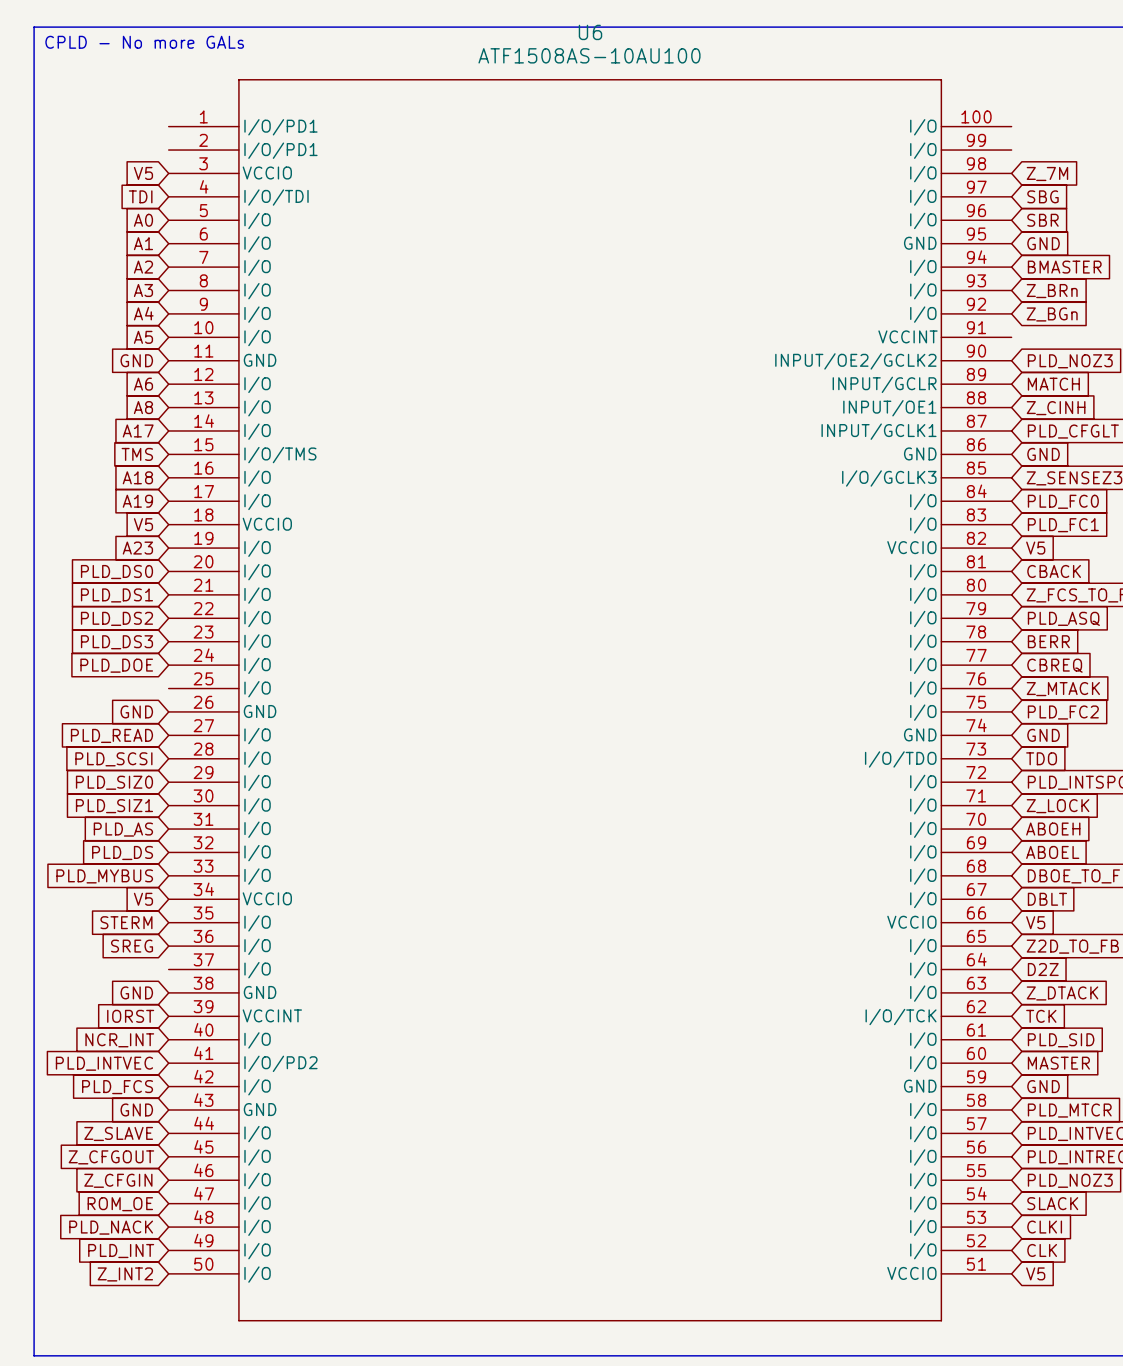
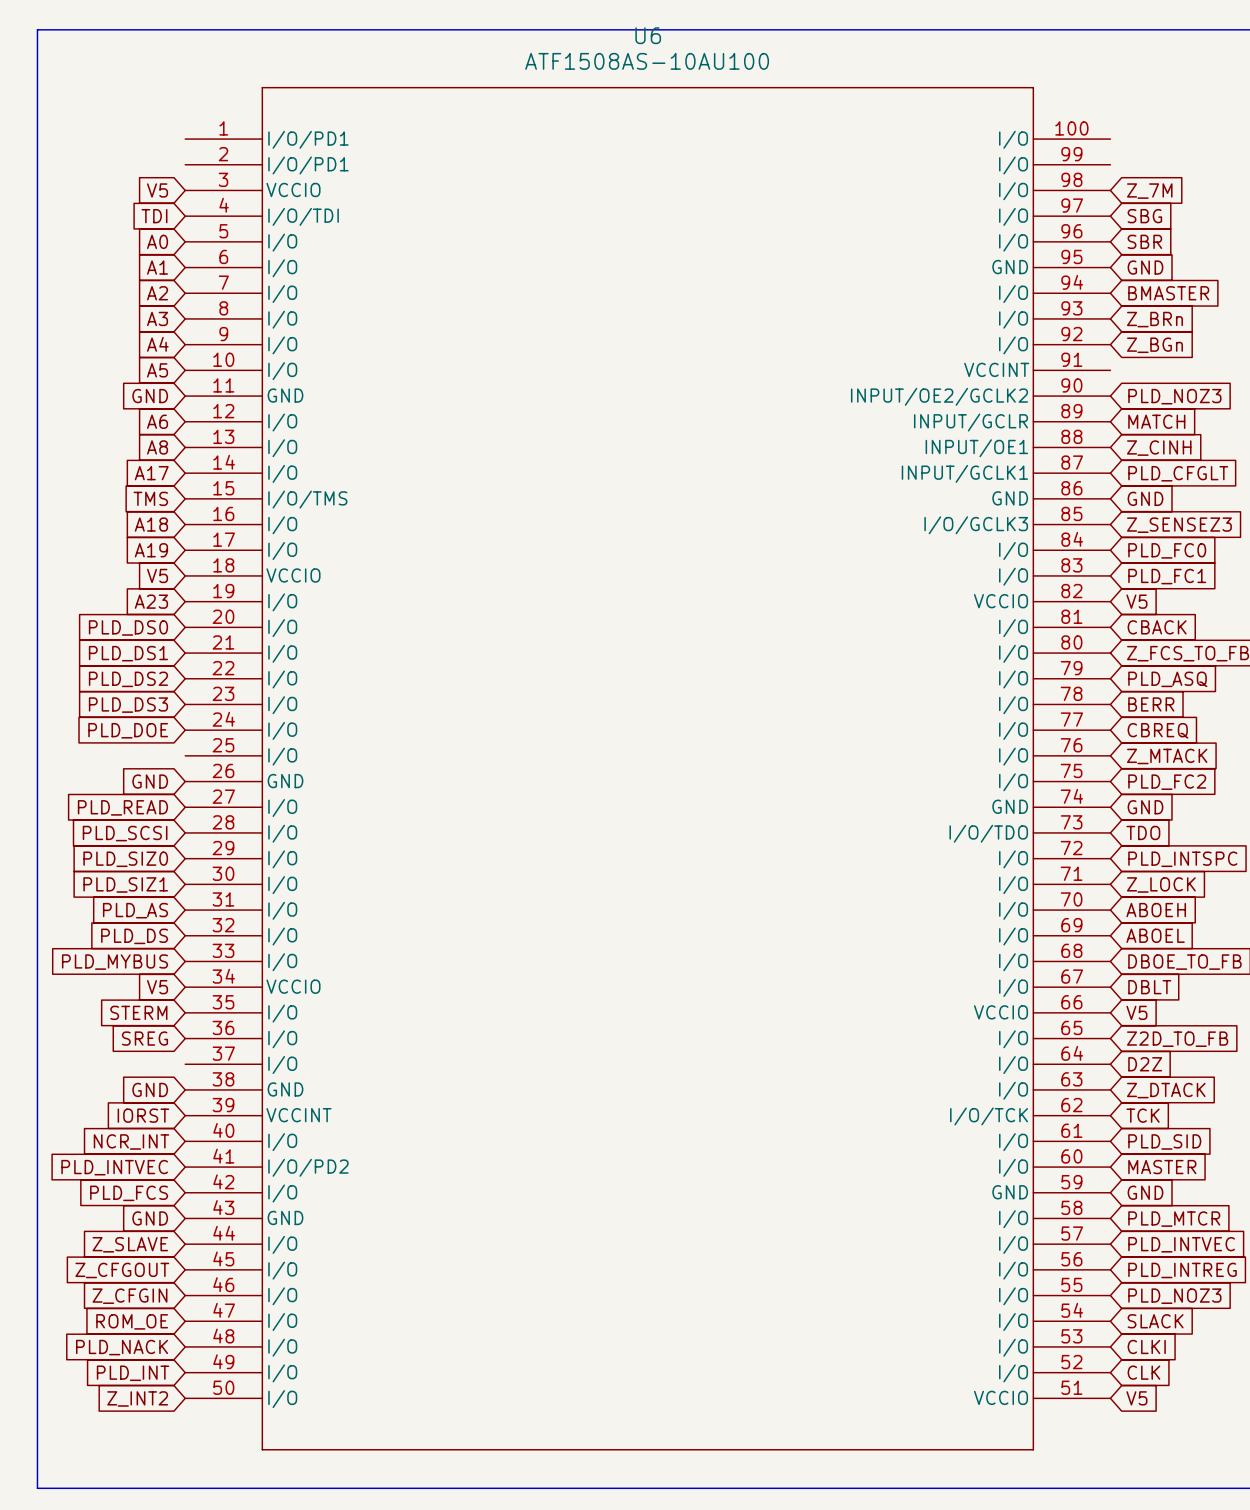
text: CPLD - No more GALs (144, 42) -> none

